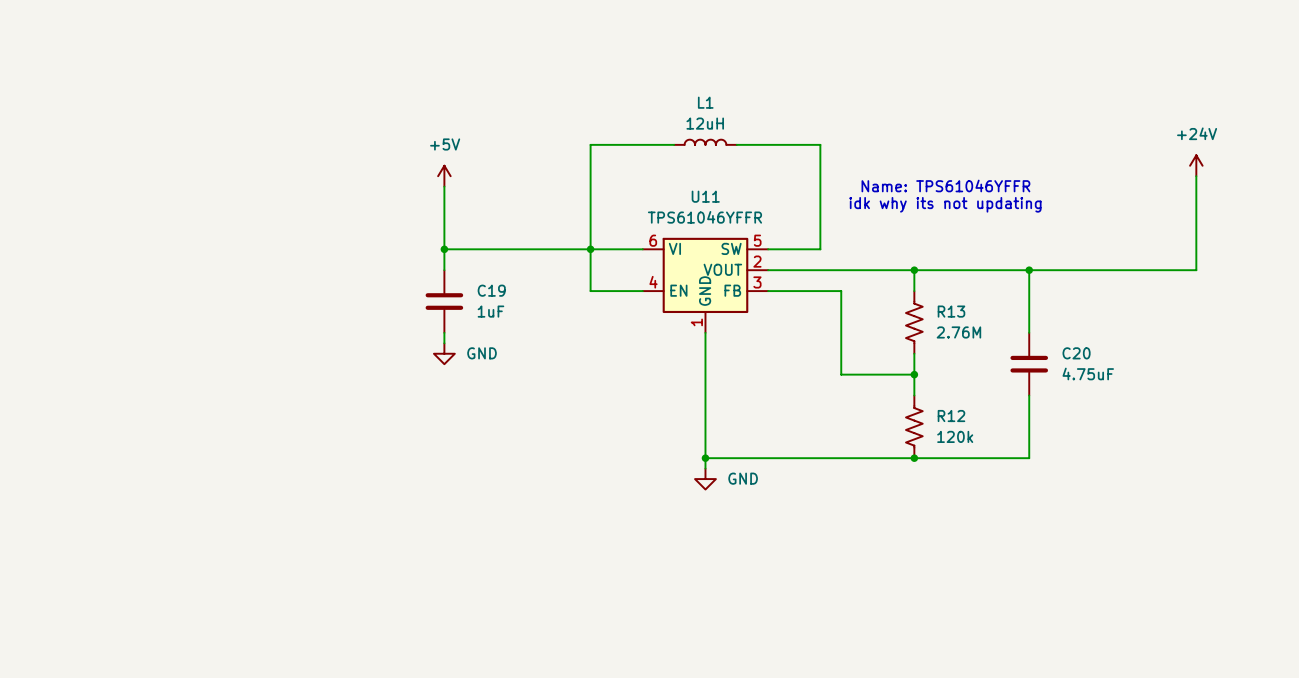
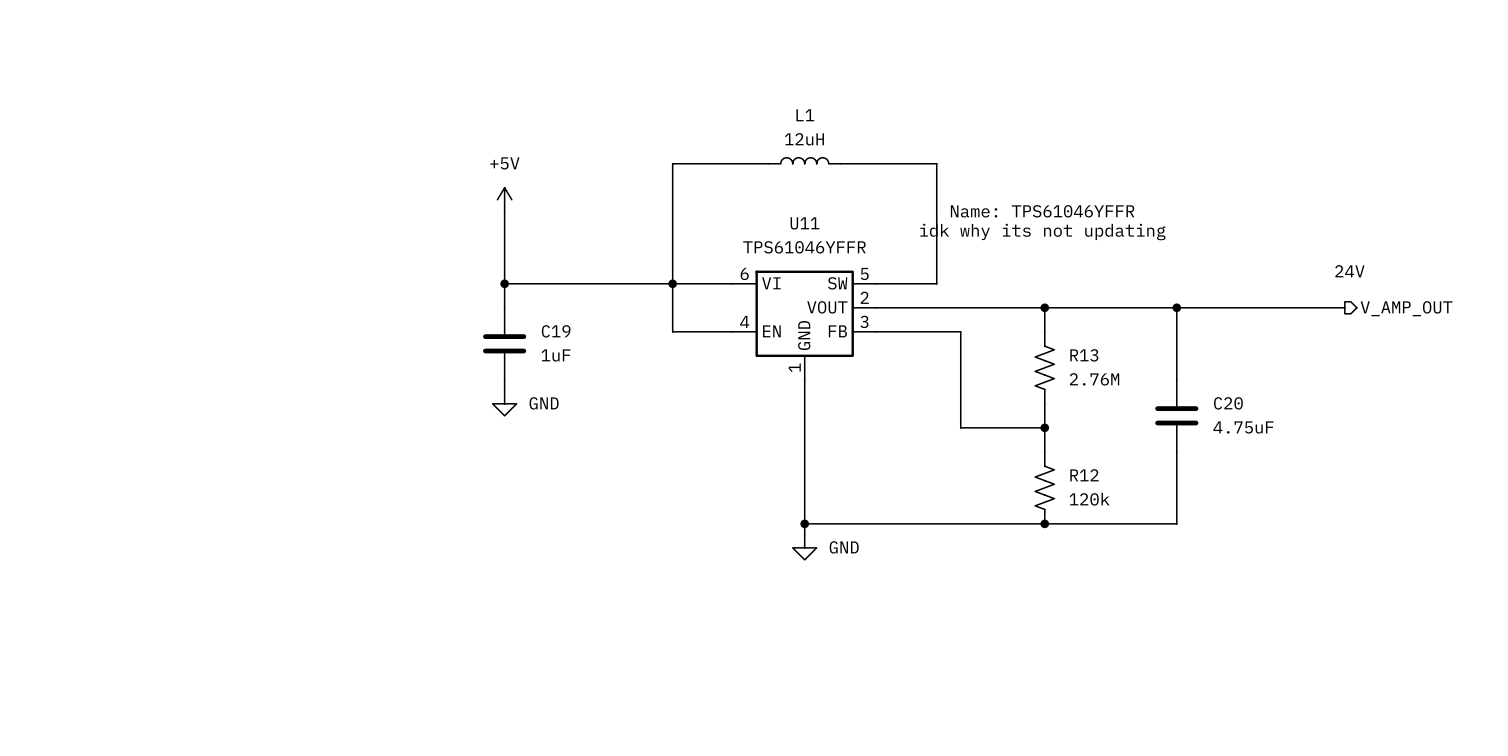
power symbol: +24V (1196, 165) -> none
wire: (1196, 176) (1196, 270) (1175, 270) -> none
text position: Name: TPS61046YFFR (945, 185) -> Name: TPS61046YFFR (1042, 211)
text position: idk why its not updating (945, 204) -> idk why its not updating (1042, 232)
text: none -> 24V (1349, 271)
hierarchical label: none -> V_AMP_OUT (1406, 308)

